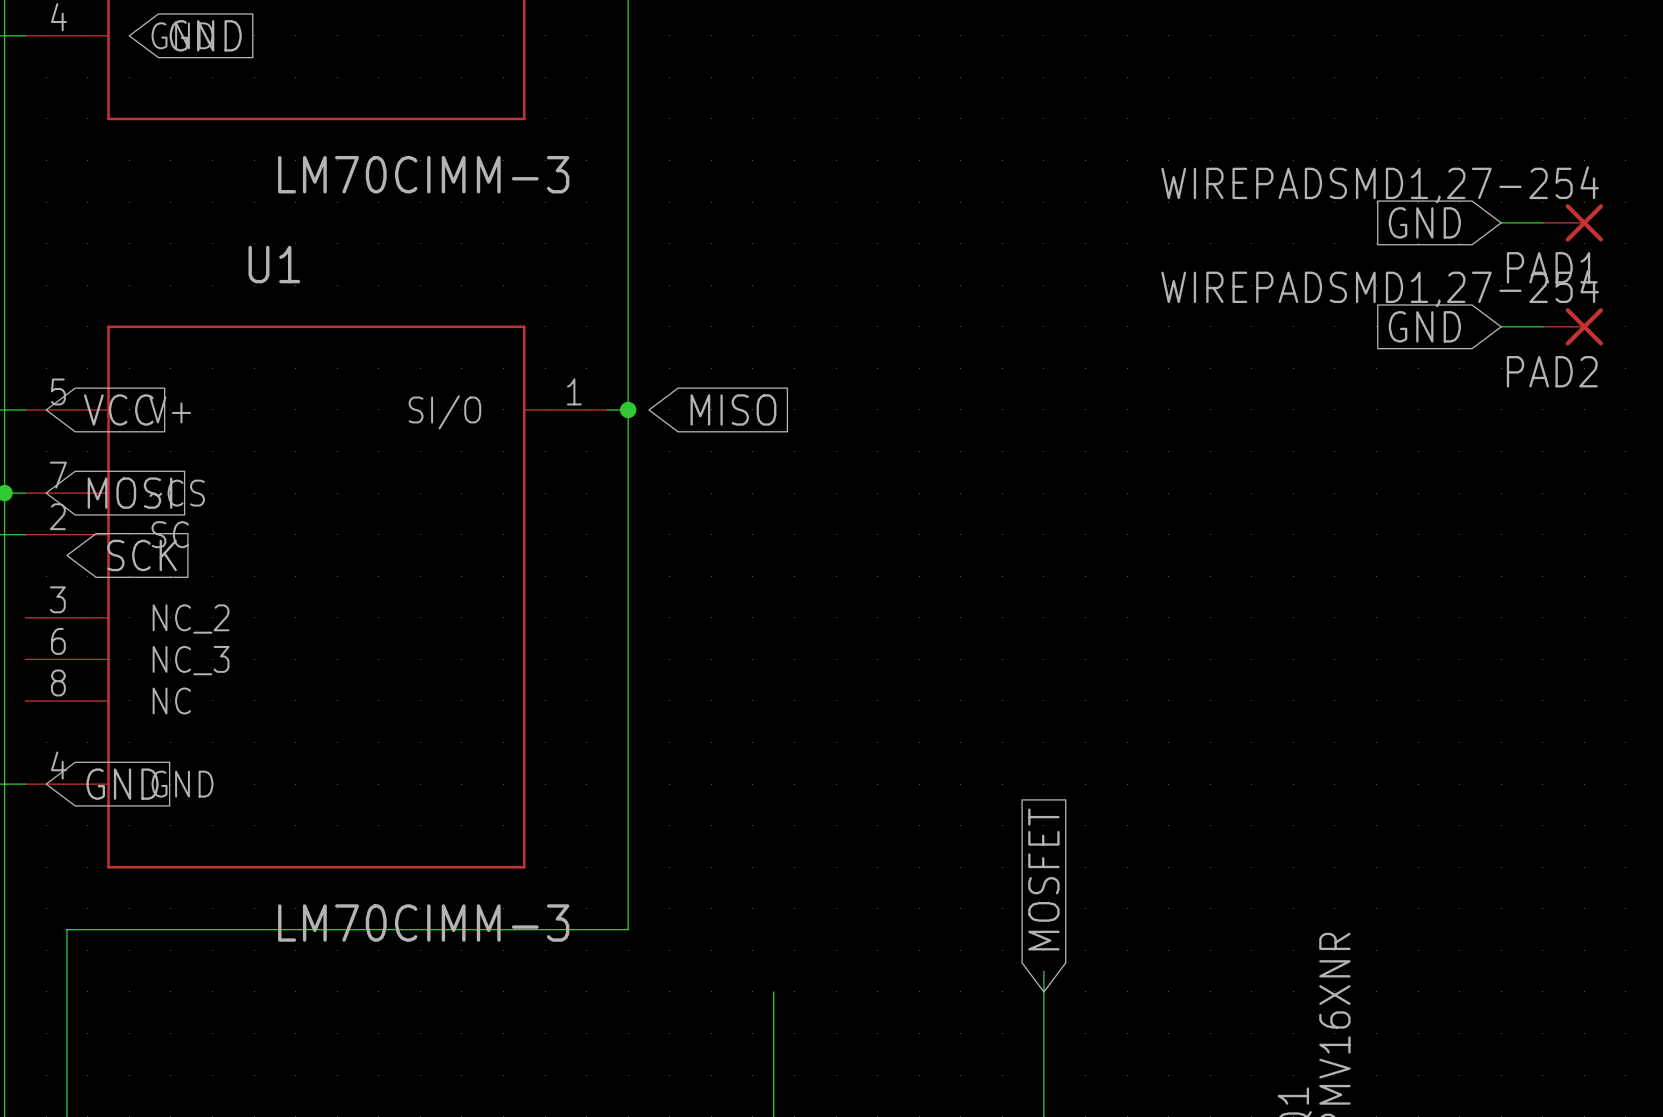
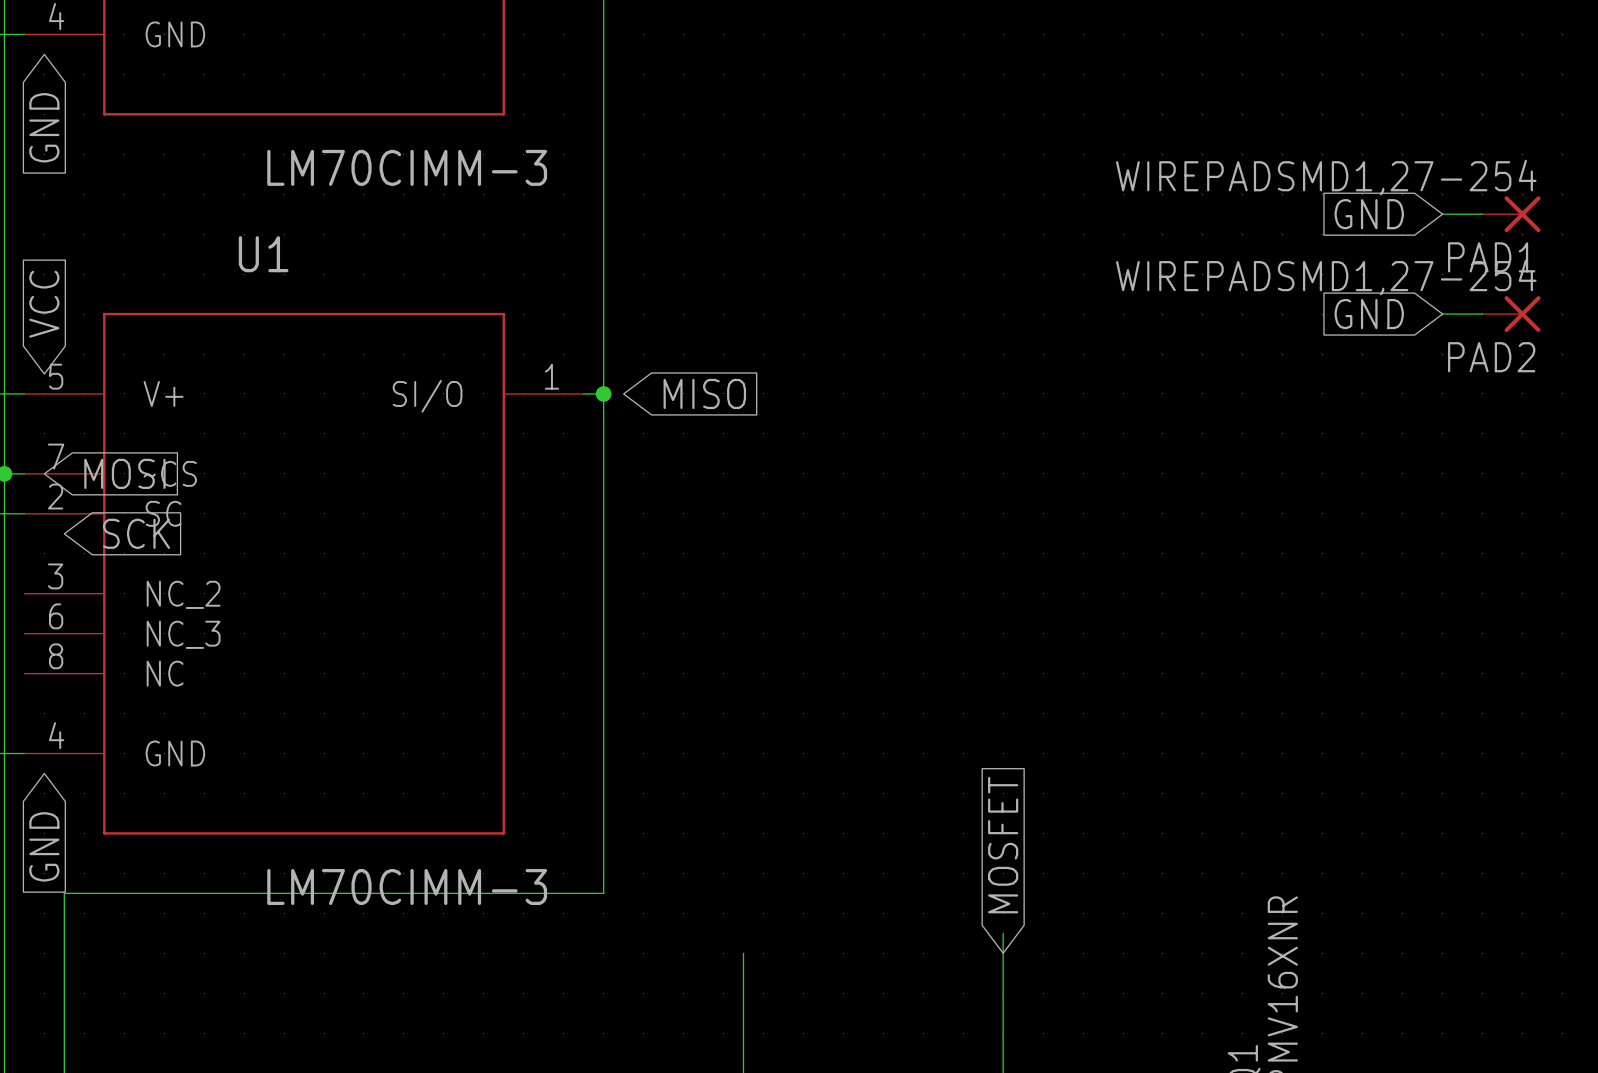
global label rotation: 0° (205, 35) -> 90° clockwise (44, 127)
global label position: GND (205, 35) -> GND (44, 127)
global label rotation: 0° (118, 409) -> 90° counterclockwise (44, 304)
global label rotation: 0° (122, 784) -> 90° clockwise (44, 846)

